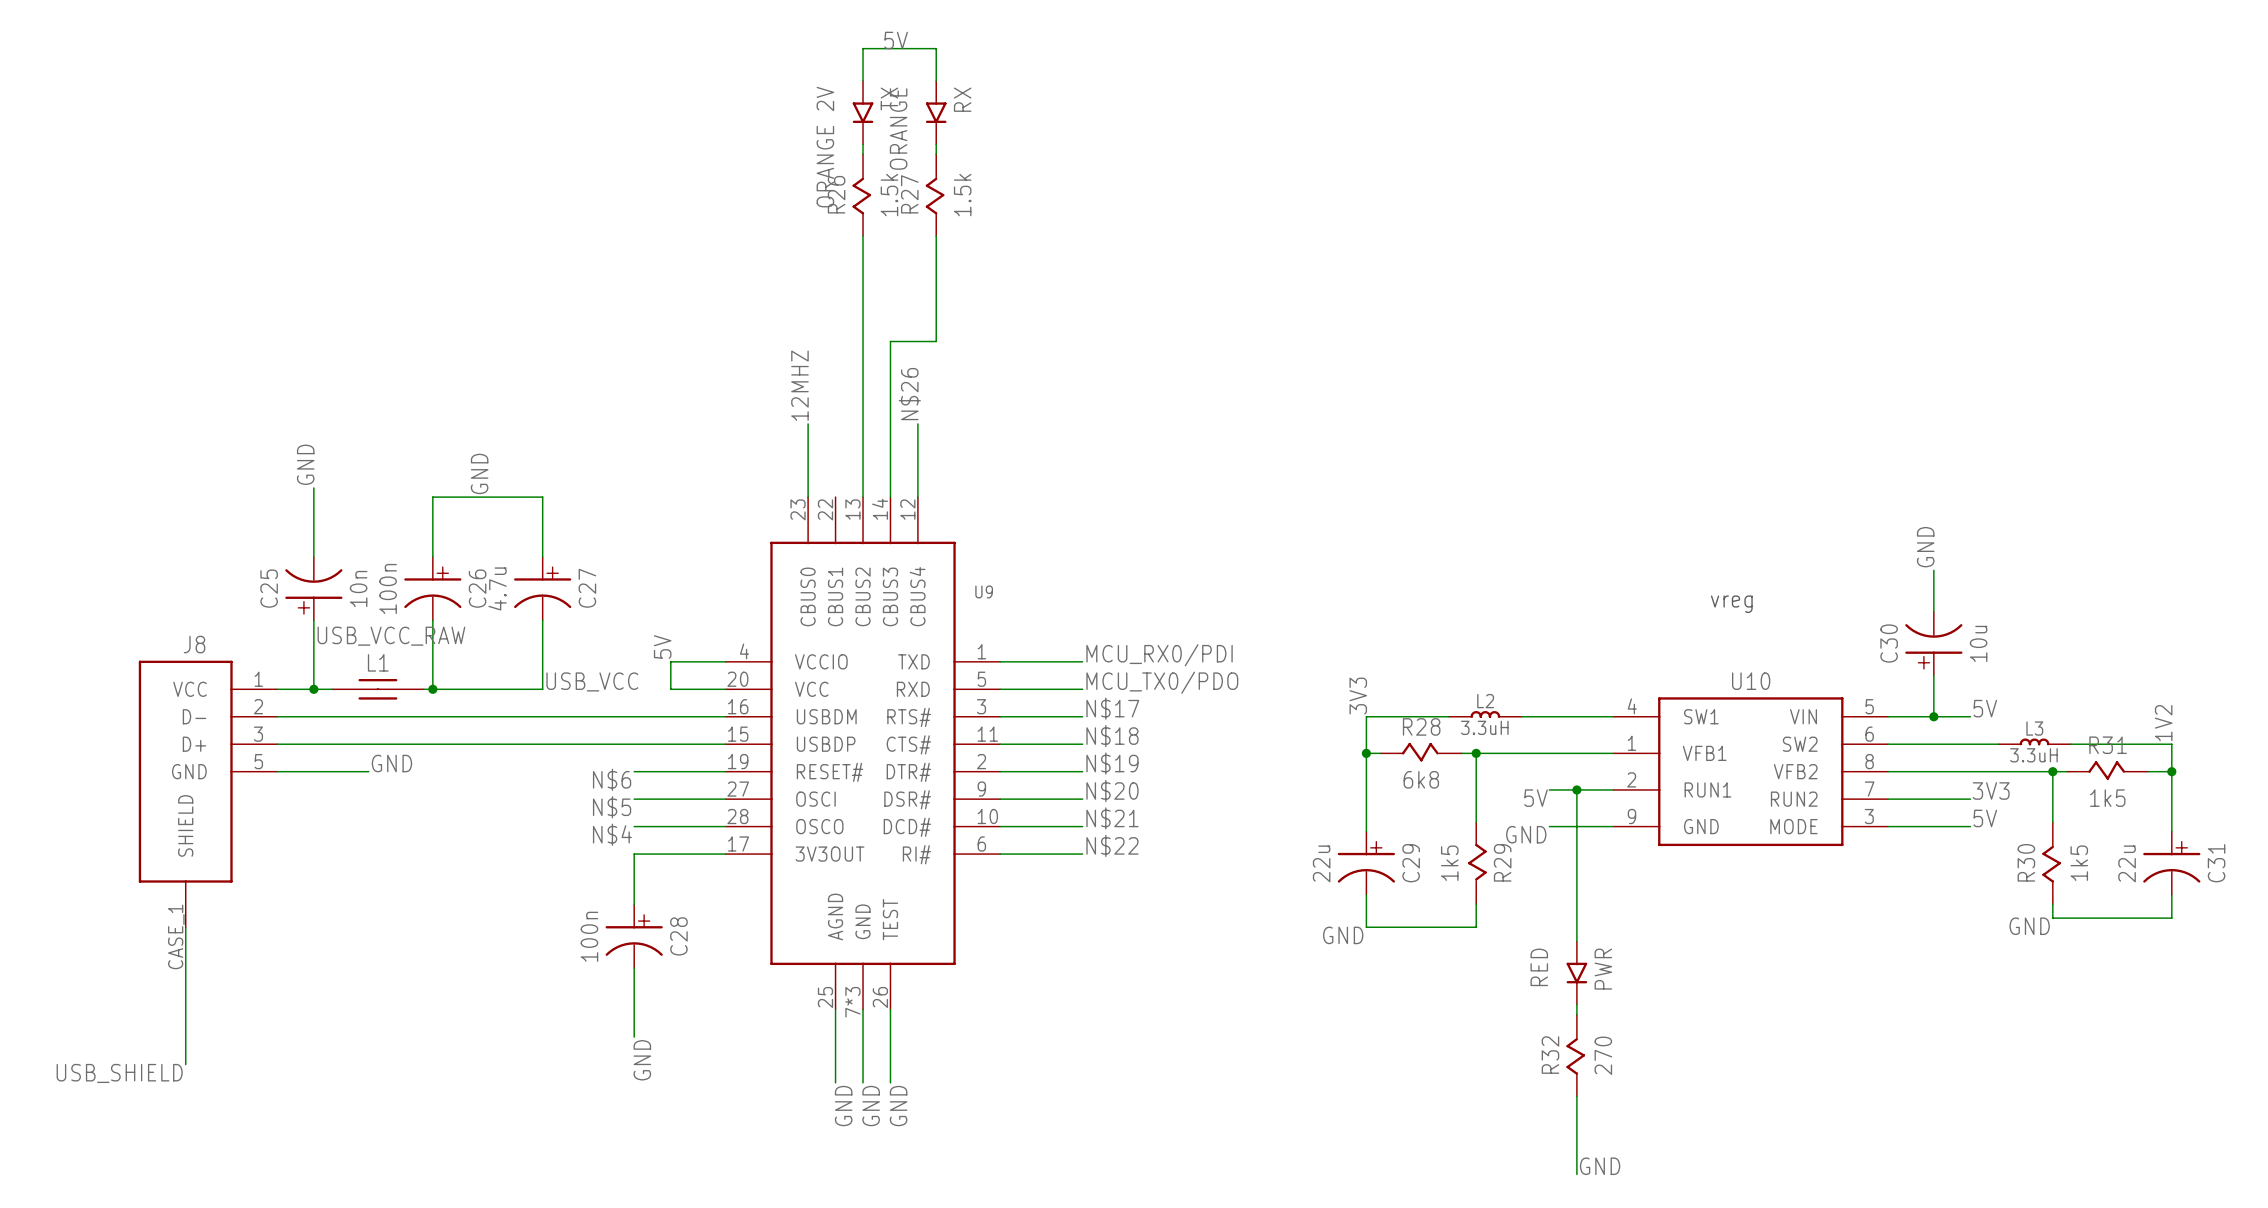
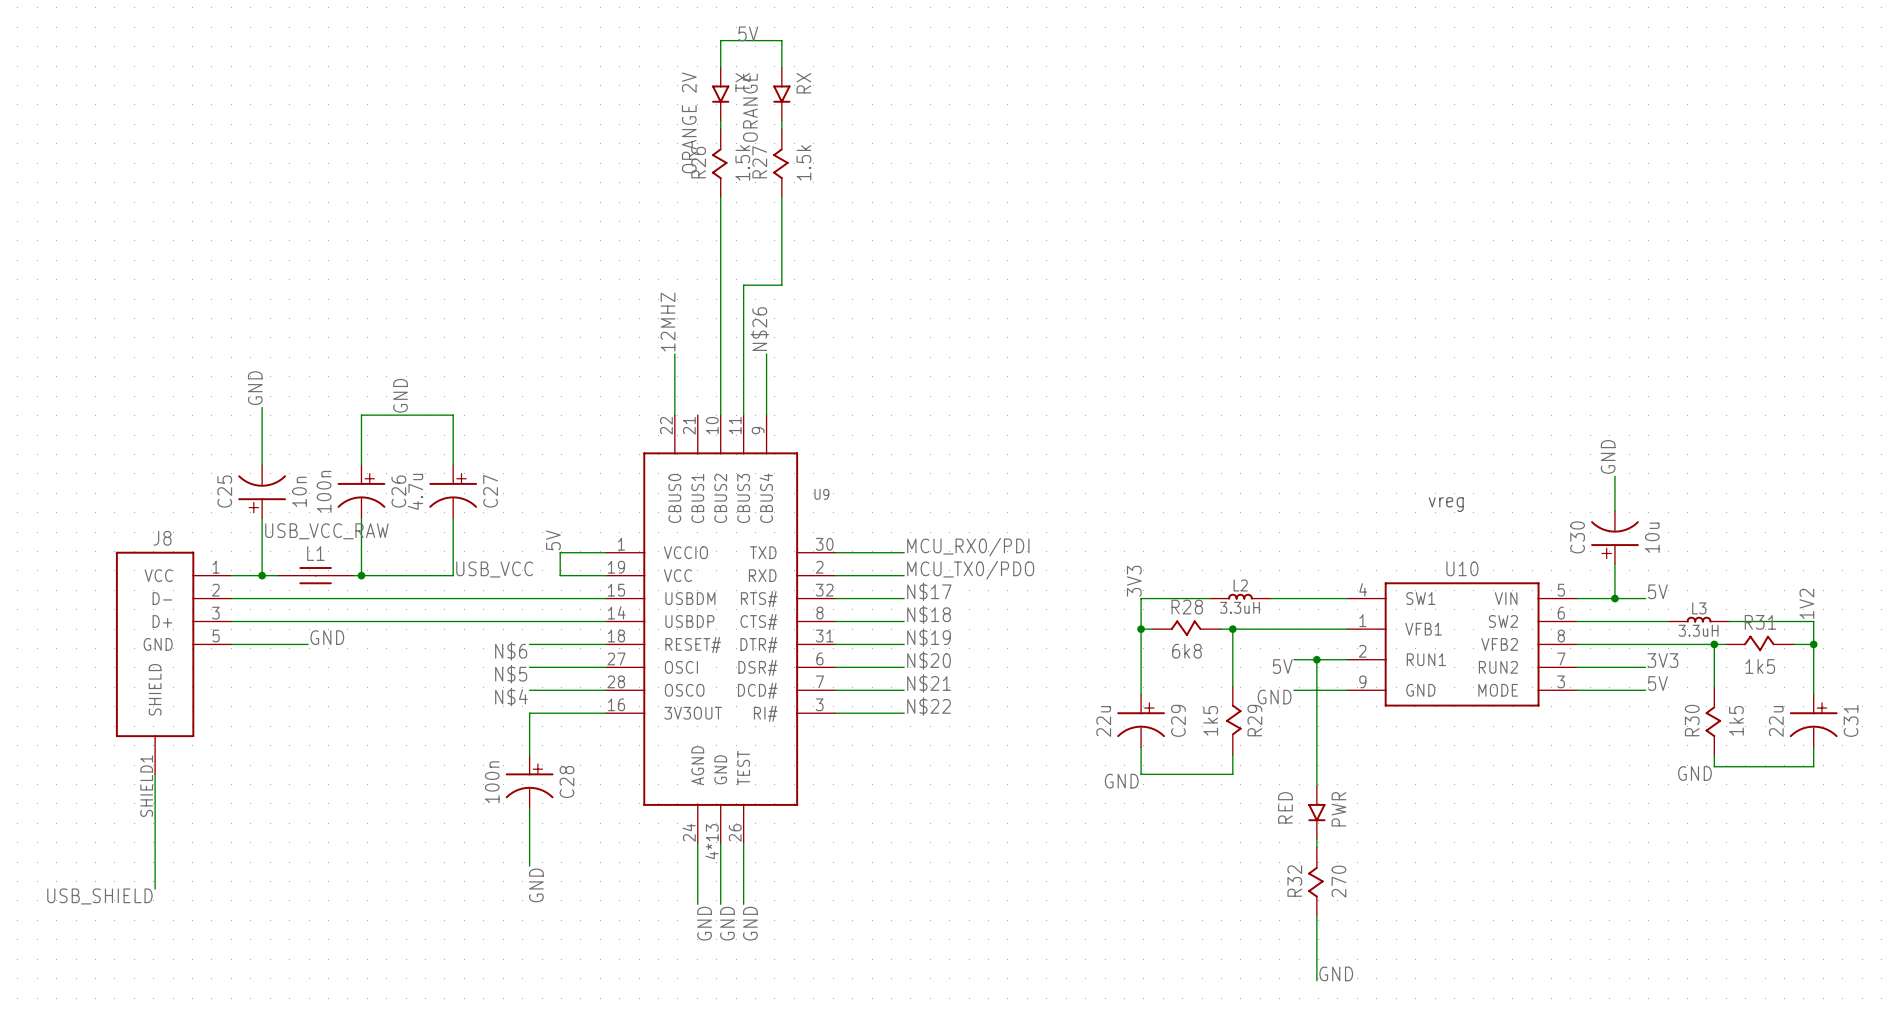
U9 symbol: [725, 497, 1001, 1010] -> [606, 415, 836, 844]
J8 pin number: CASE_1 (176, 936) -> SHIELD1 (146, 786)

